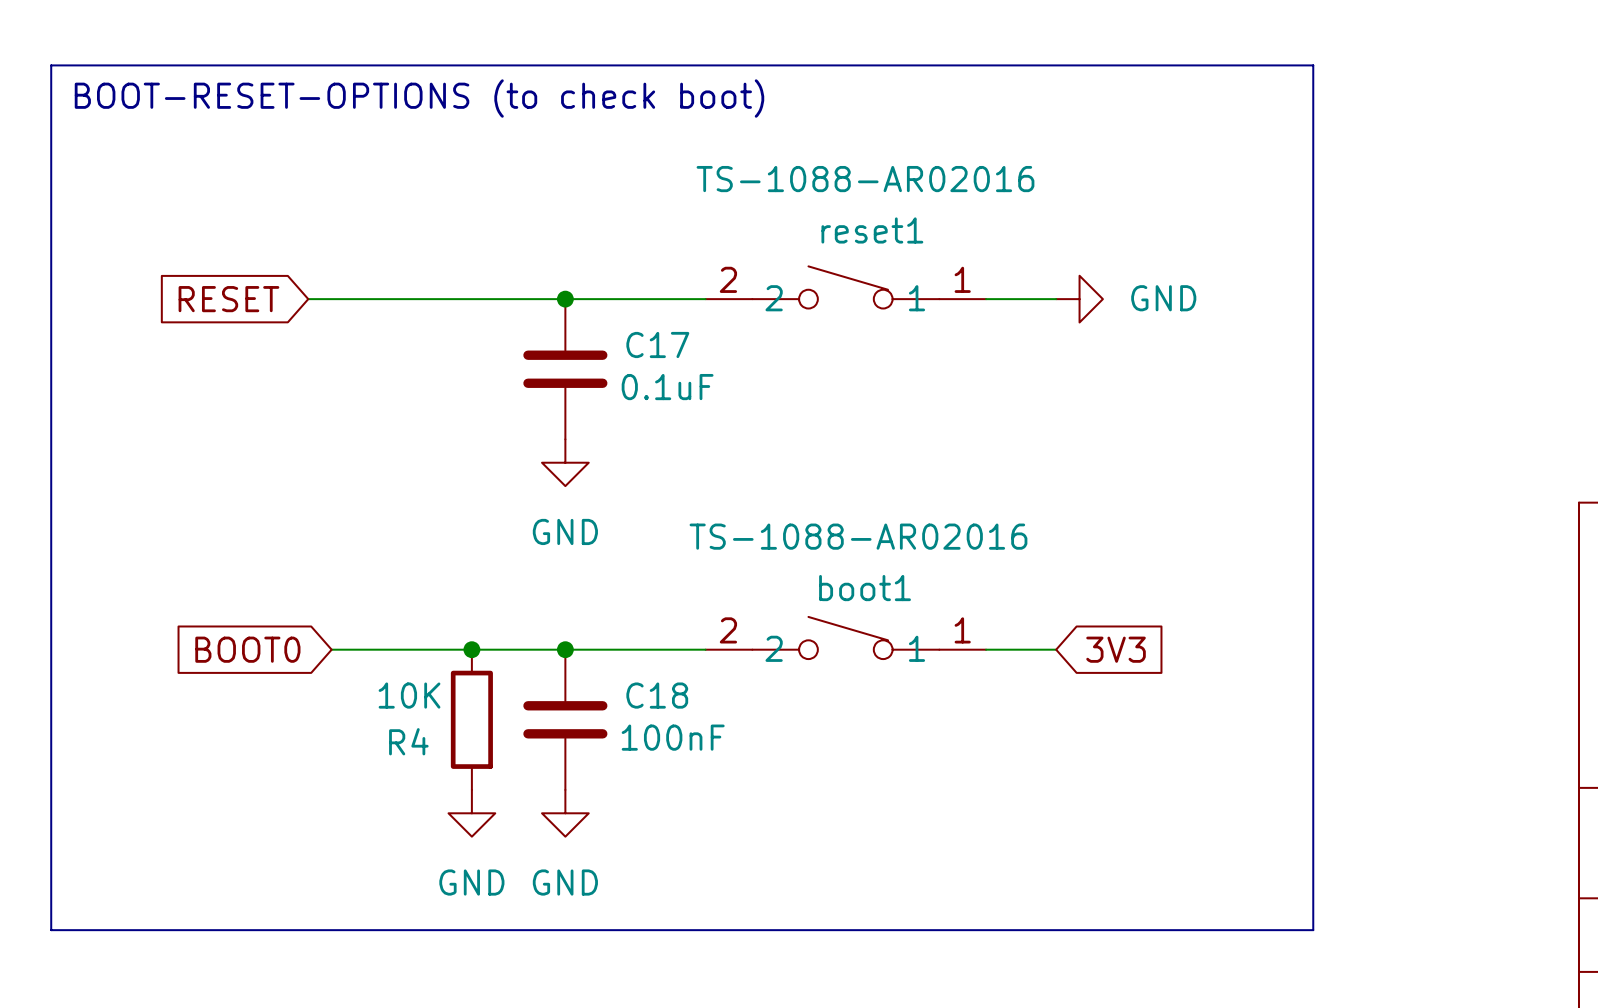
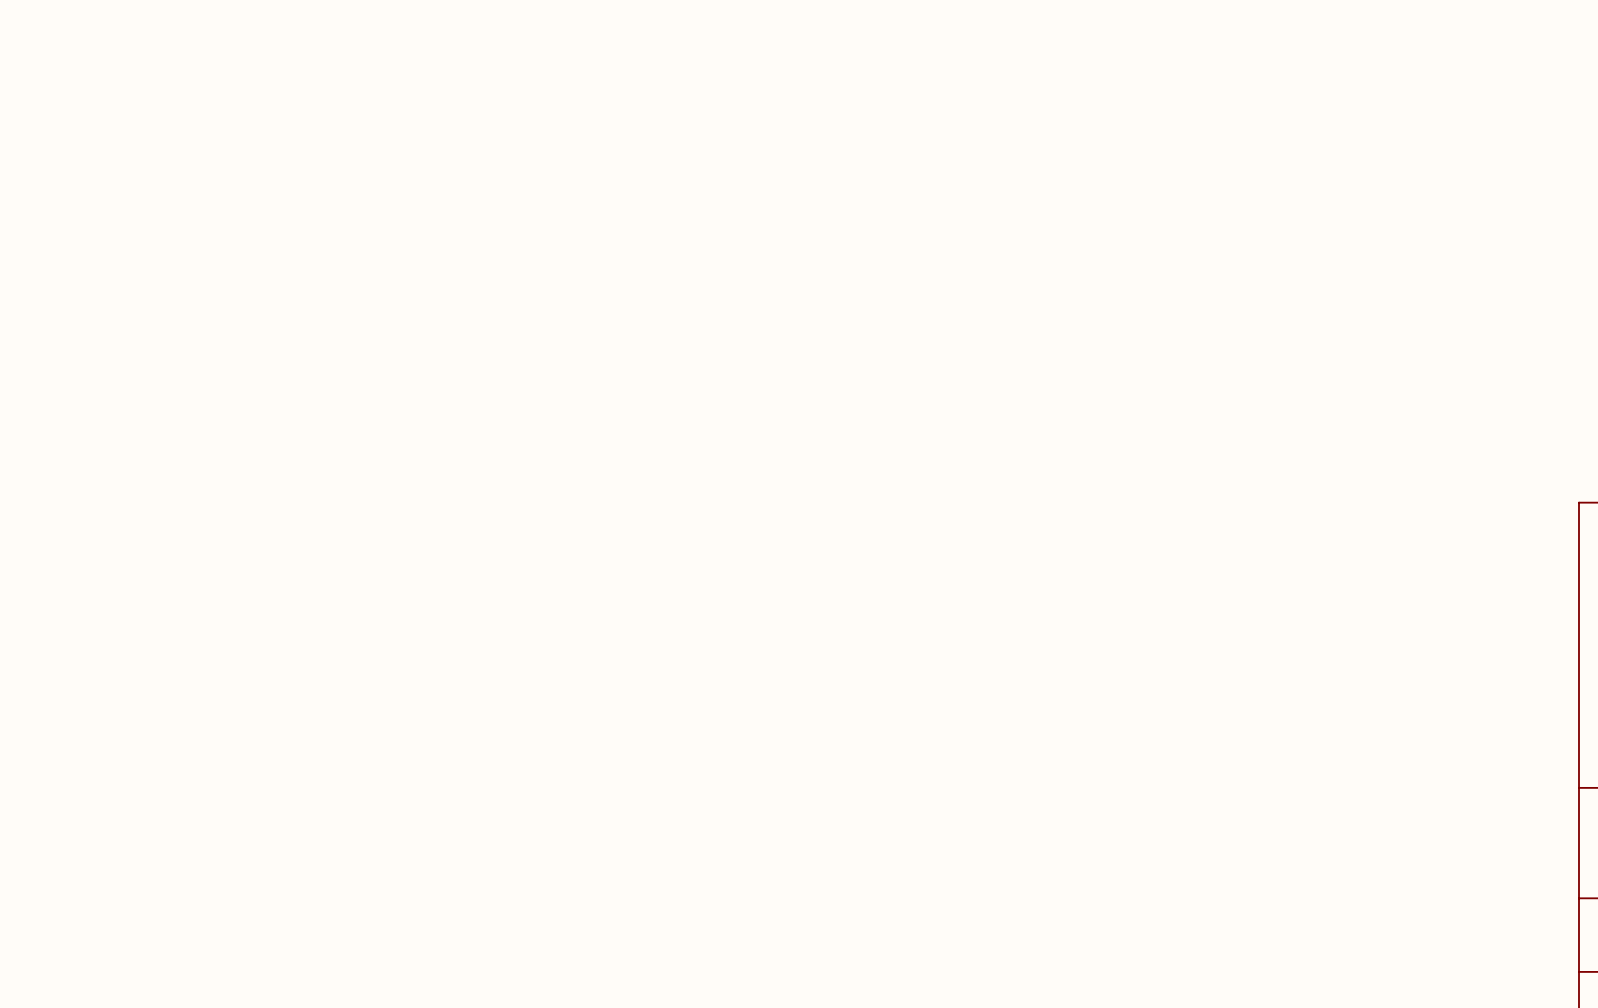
line: (51, 65) (1313, 65) (1313, 930) (51, 930) (51, 65) -> none
text: BOOT-RESET-OPTIONS (to check boot) (419, 98) -> none
reset1: TS-1088-AR02016 (845, 287) -> none
global label: RESET (228, 299) -> none
wire: (308, 299) (705, 299) -> none
junction: (565, 299) -> none
wire: (986, 299) (1056, 299) -> none
power symbol: GND (1079, 299) -> none
C17: 0.1uF (565, 369) -> none
power symbol: GND (565, 462) -> none
boot1: TS-1088-AR02016 (845, 638) -> none
global label: BOOT0 (247, 649) -> none
wire: (331, 649) (705, 649) -> none
junction: (471, 649) -> none
junction: (565, 649) -> none
wire: (986, 649) (1056, 649) -> none
global label: 3V3 (1116, 649) -> none
R4: 10K (471, 719) -> none
C18: 100nF (565, 719) -> none
power symbol: GND (471, 813) -> none
power symbol: GND (565, 813) -> none

